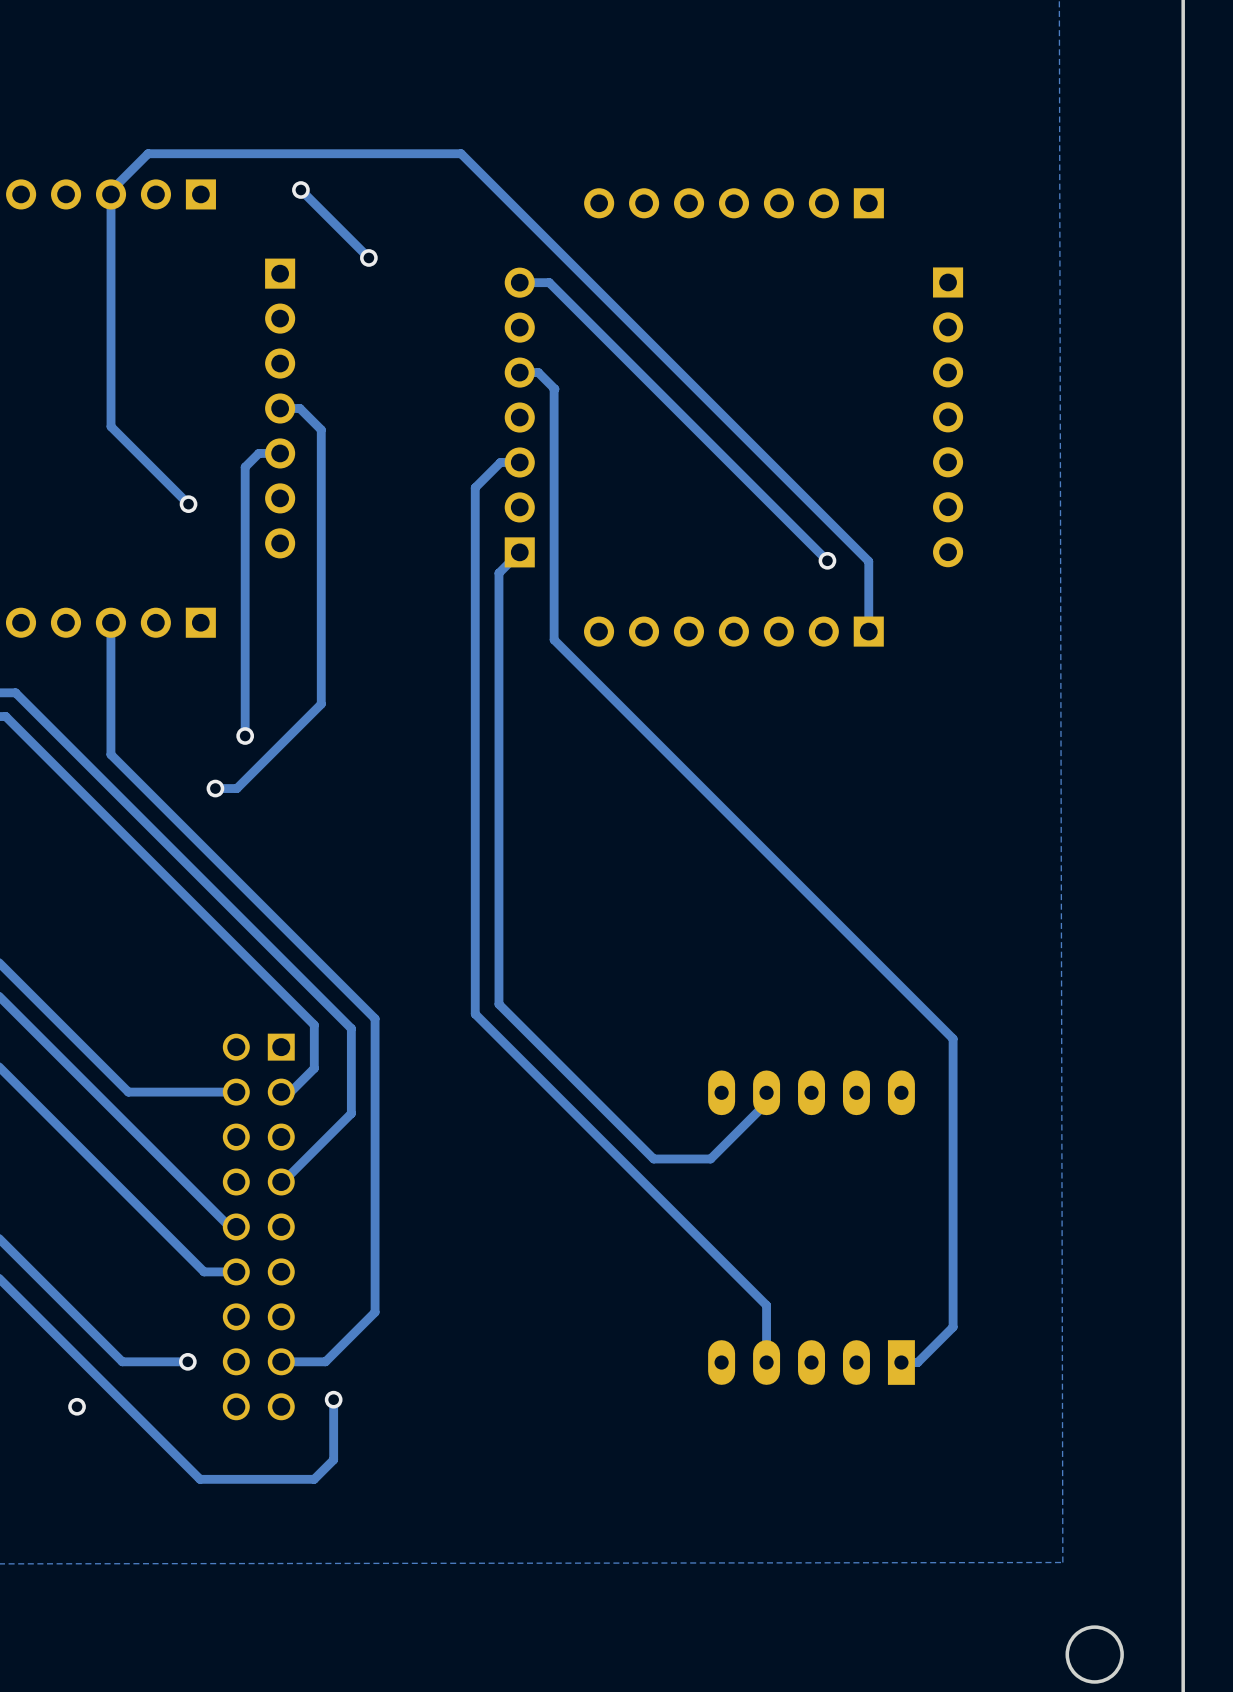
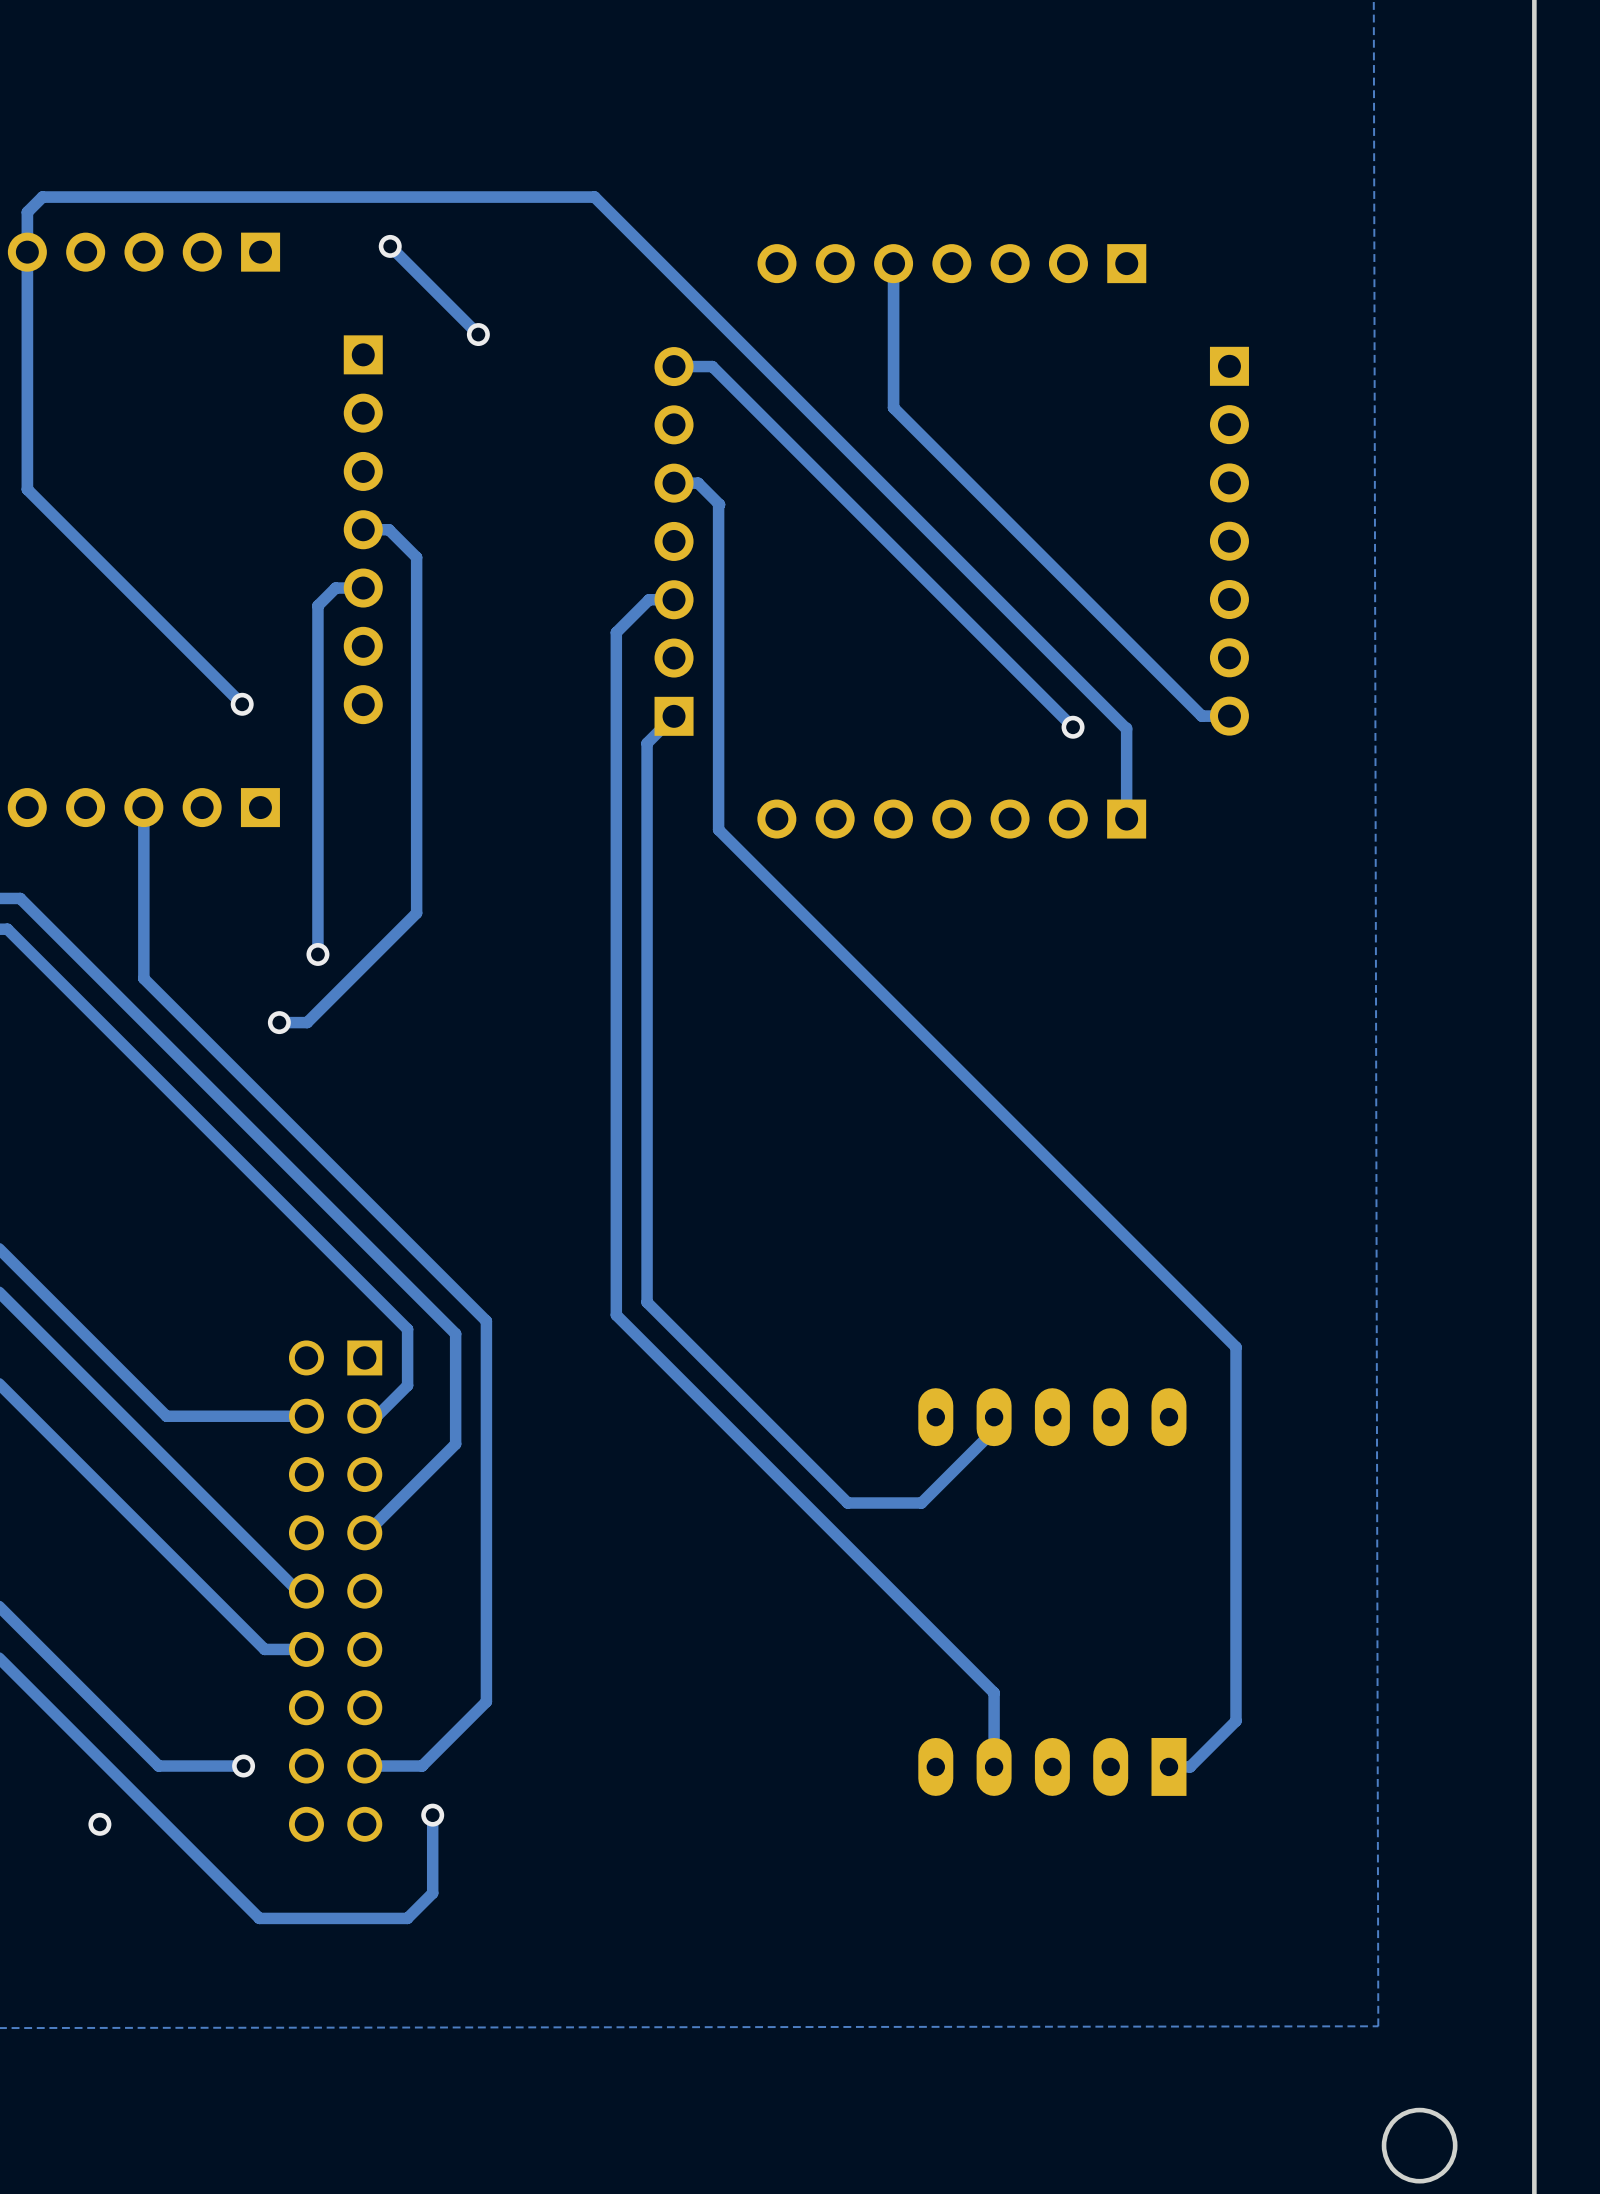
track: none -> (893, 263) (893, 407) (1201, 716) (1229, 716)
track: (188, 504) (111, 426) (111, 190) (148, 153) (461, 153) (868, 561) -> none
via position: (188, 504) -> (242, 704)
track: none -> (242, 704) (27, 489) (27, 212) (42, 197) (594, 197) (1126, 729)

